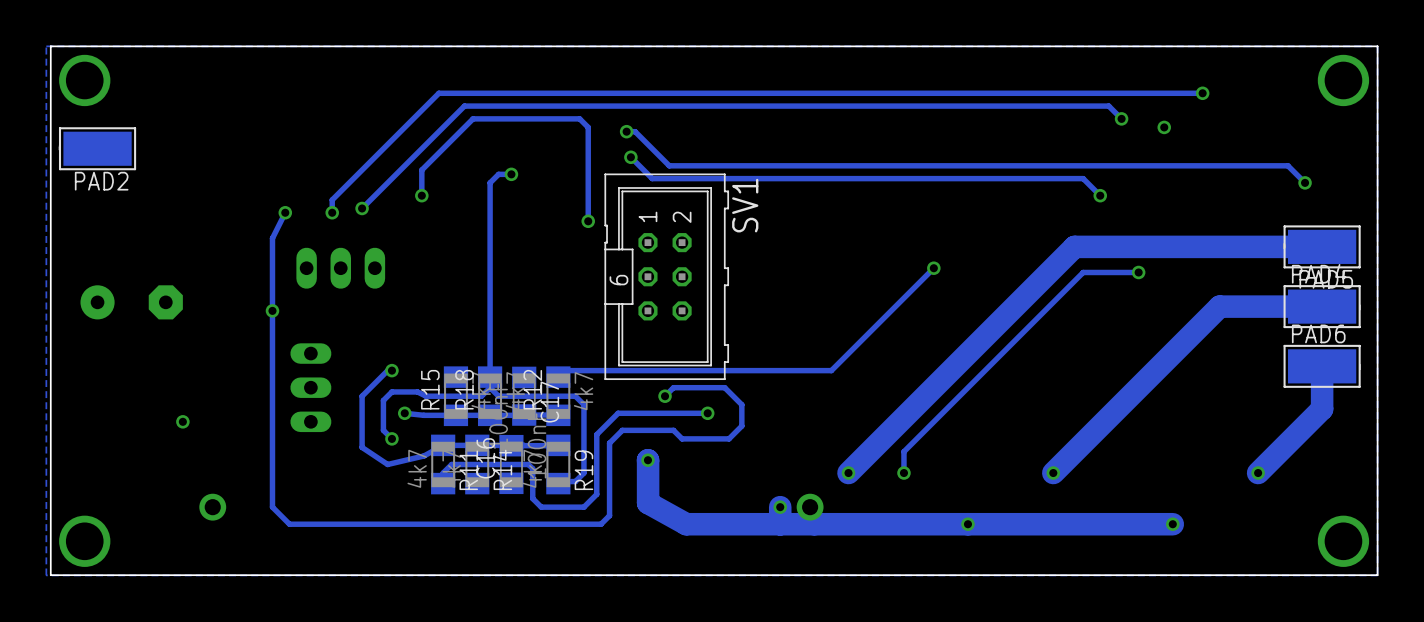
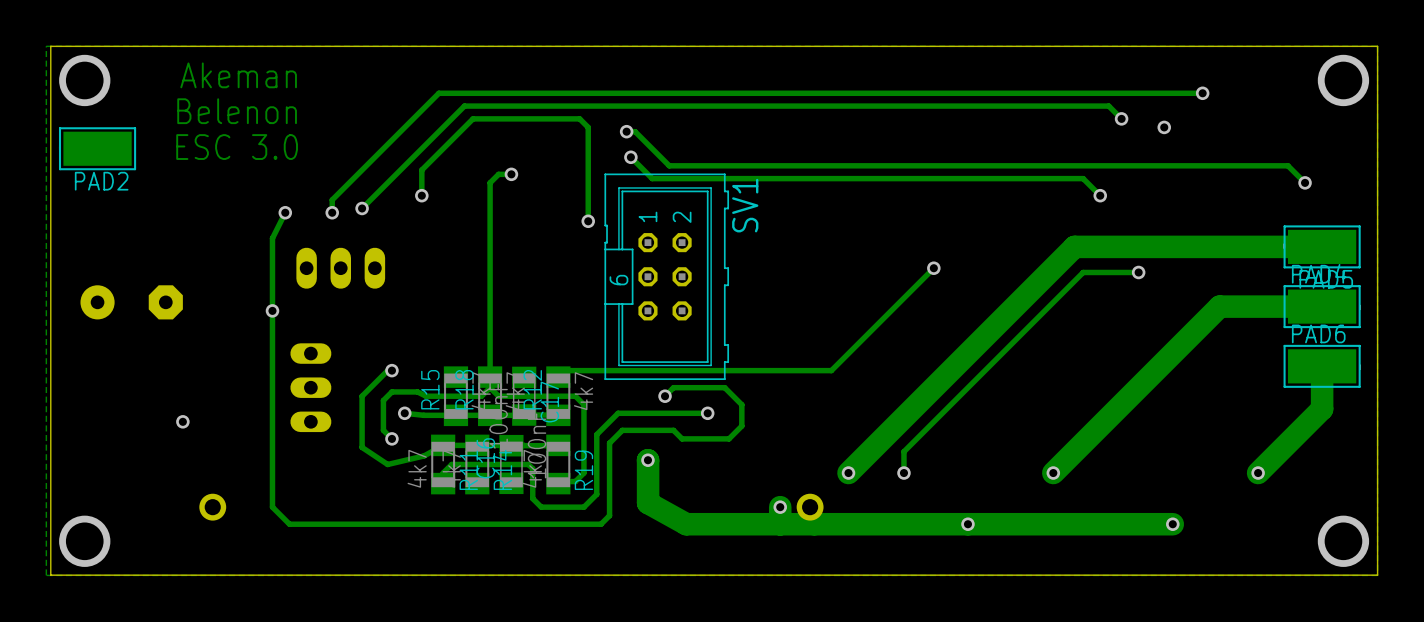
text: none -> Akeman (238, 75)
text: none -> Belenon (237, 111)
text: none -> ESC 3.0 (237, 147)

